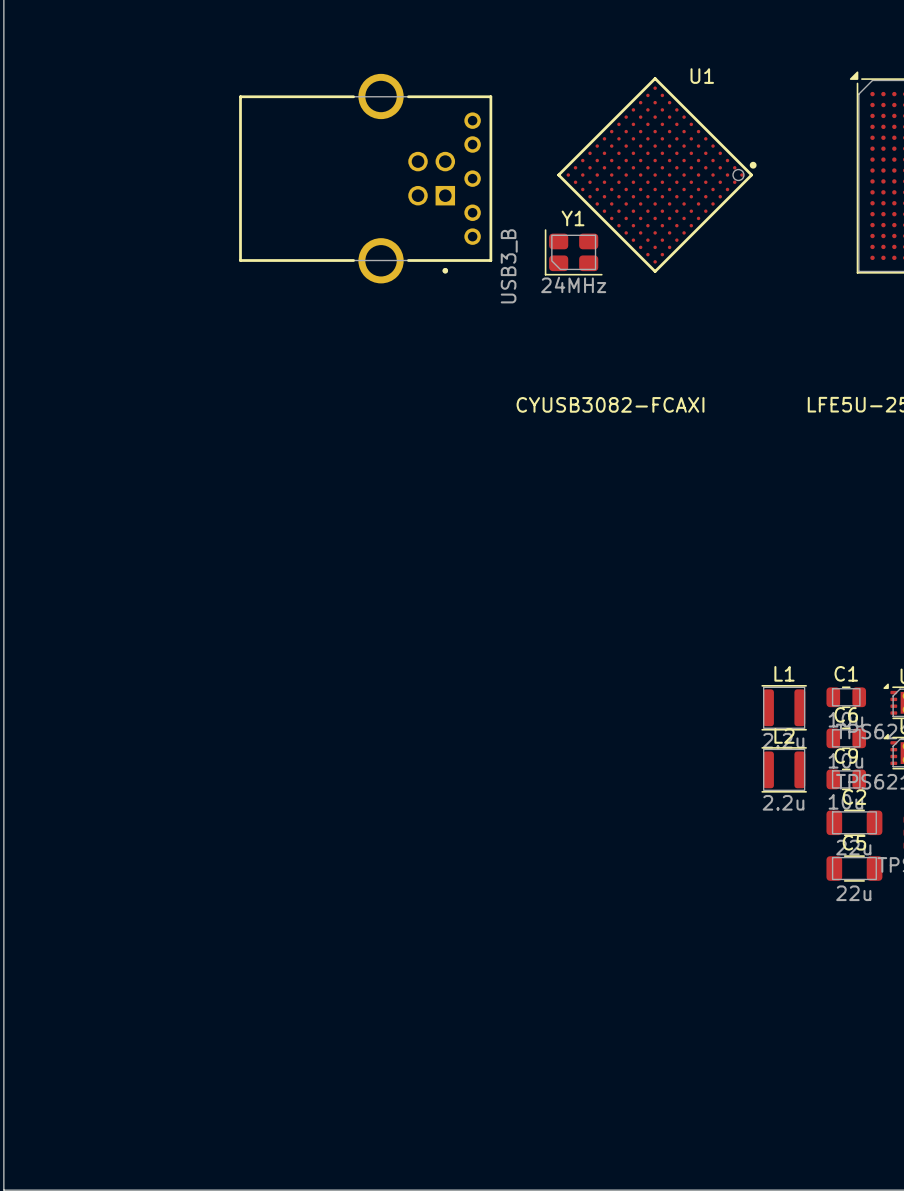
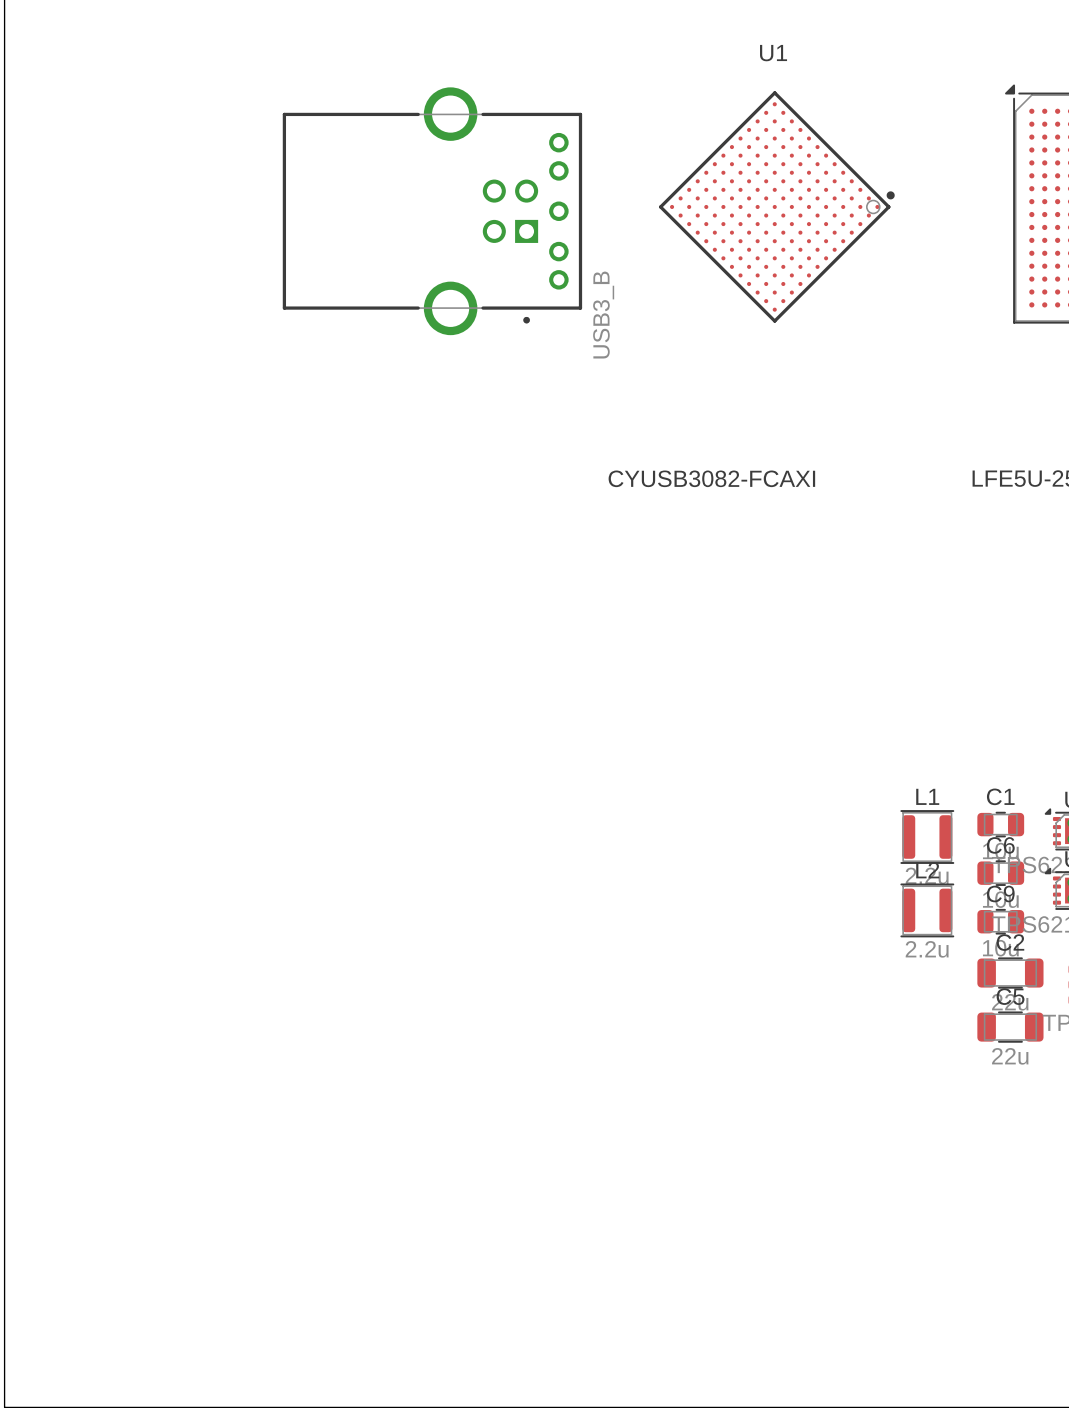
U1 name position: U1 (702, 76) -> U1 (773, 53)
Y1: 24MHz (573, 252) -> none

